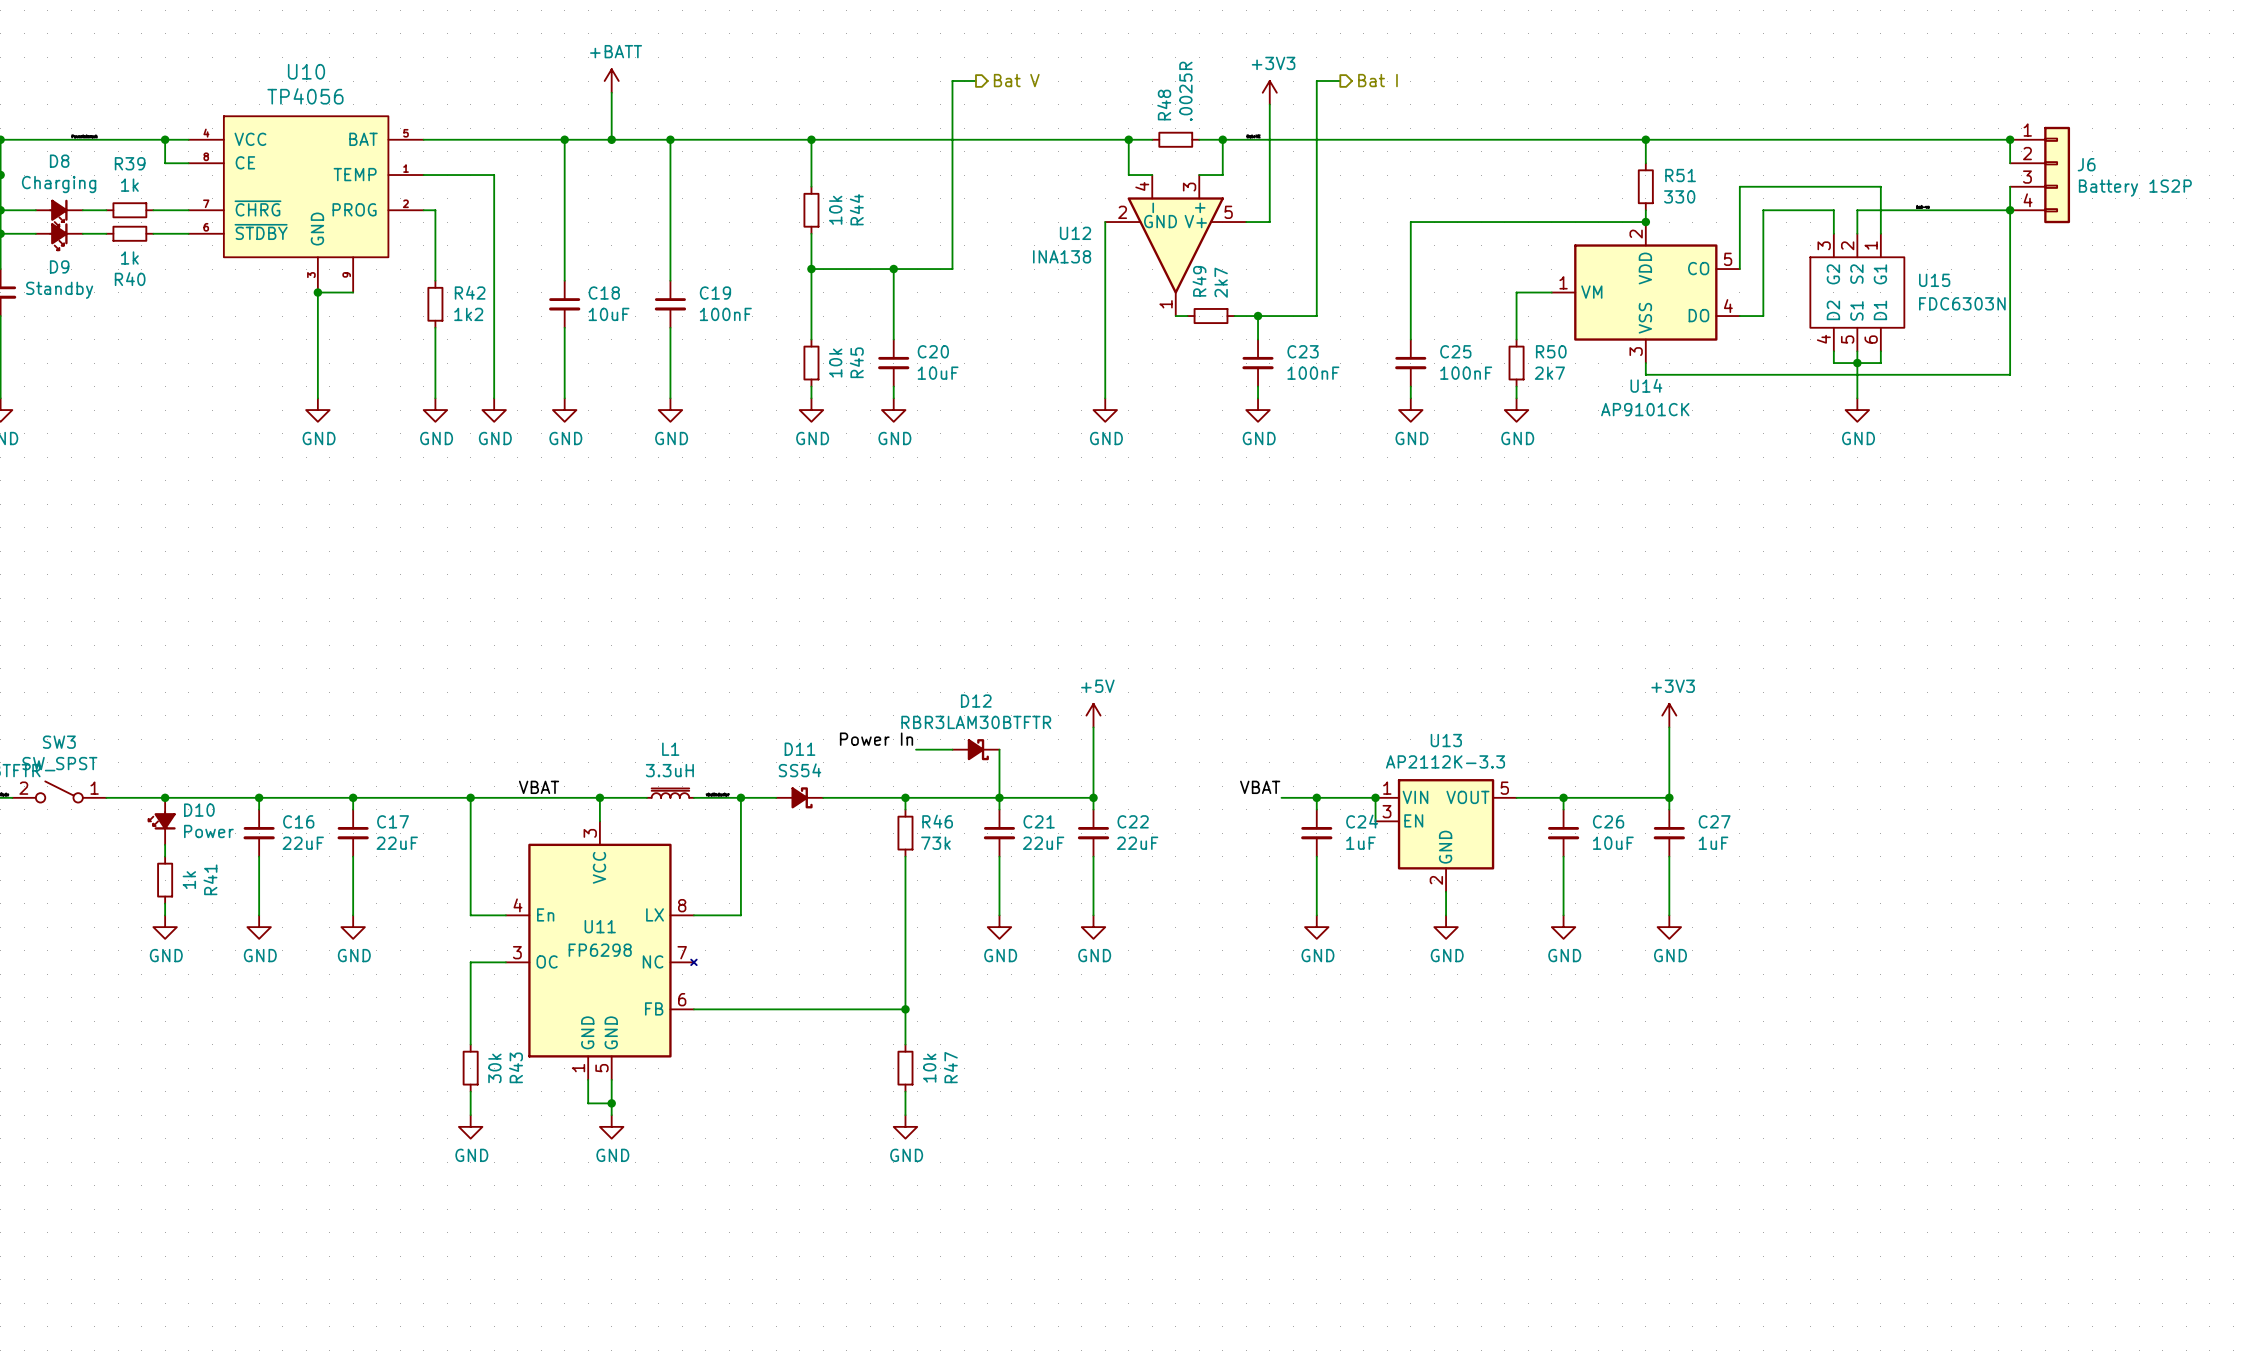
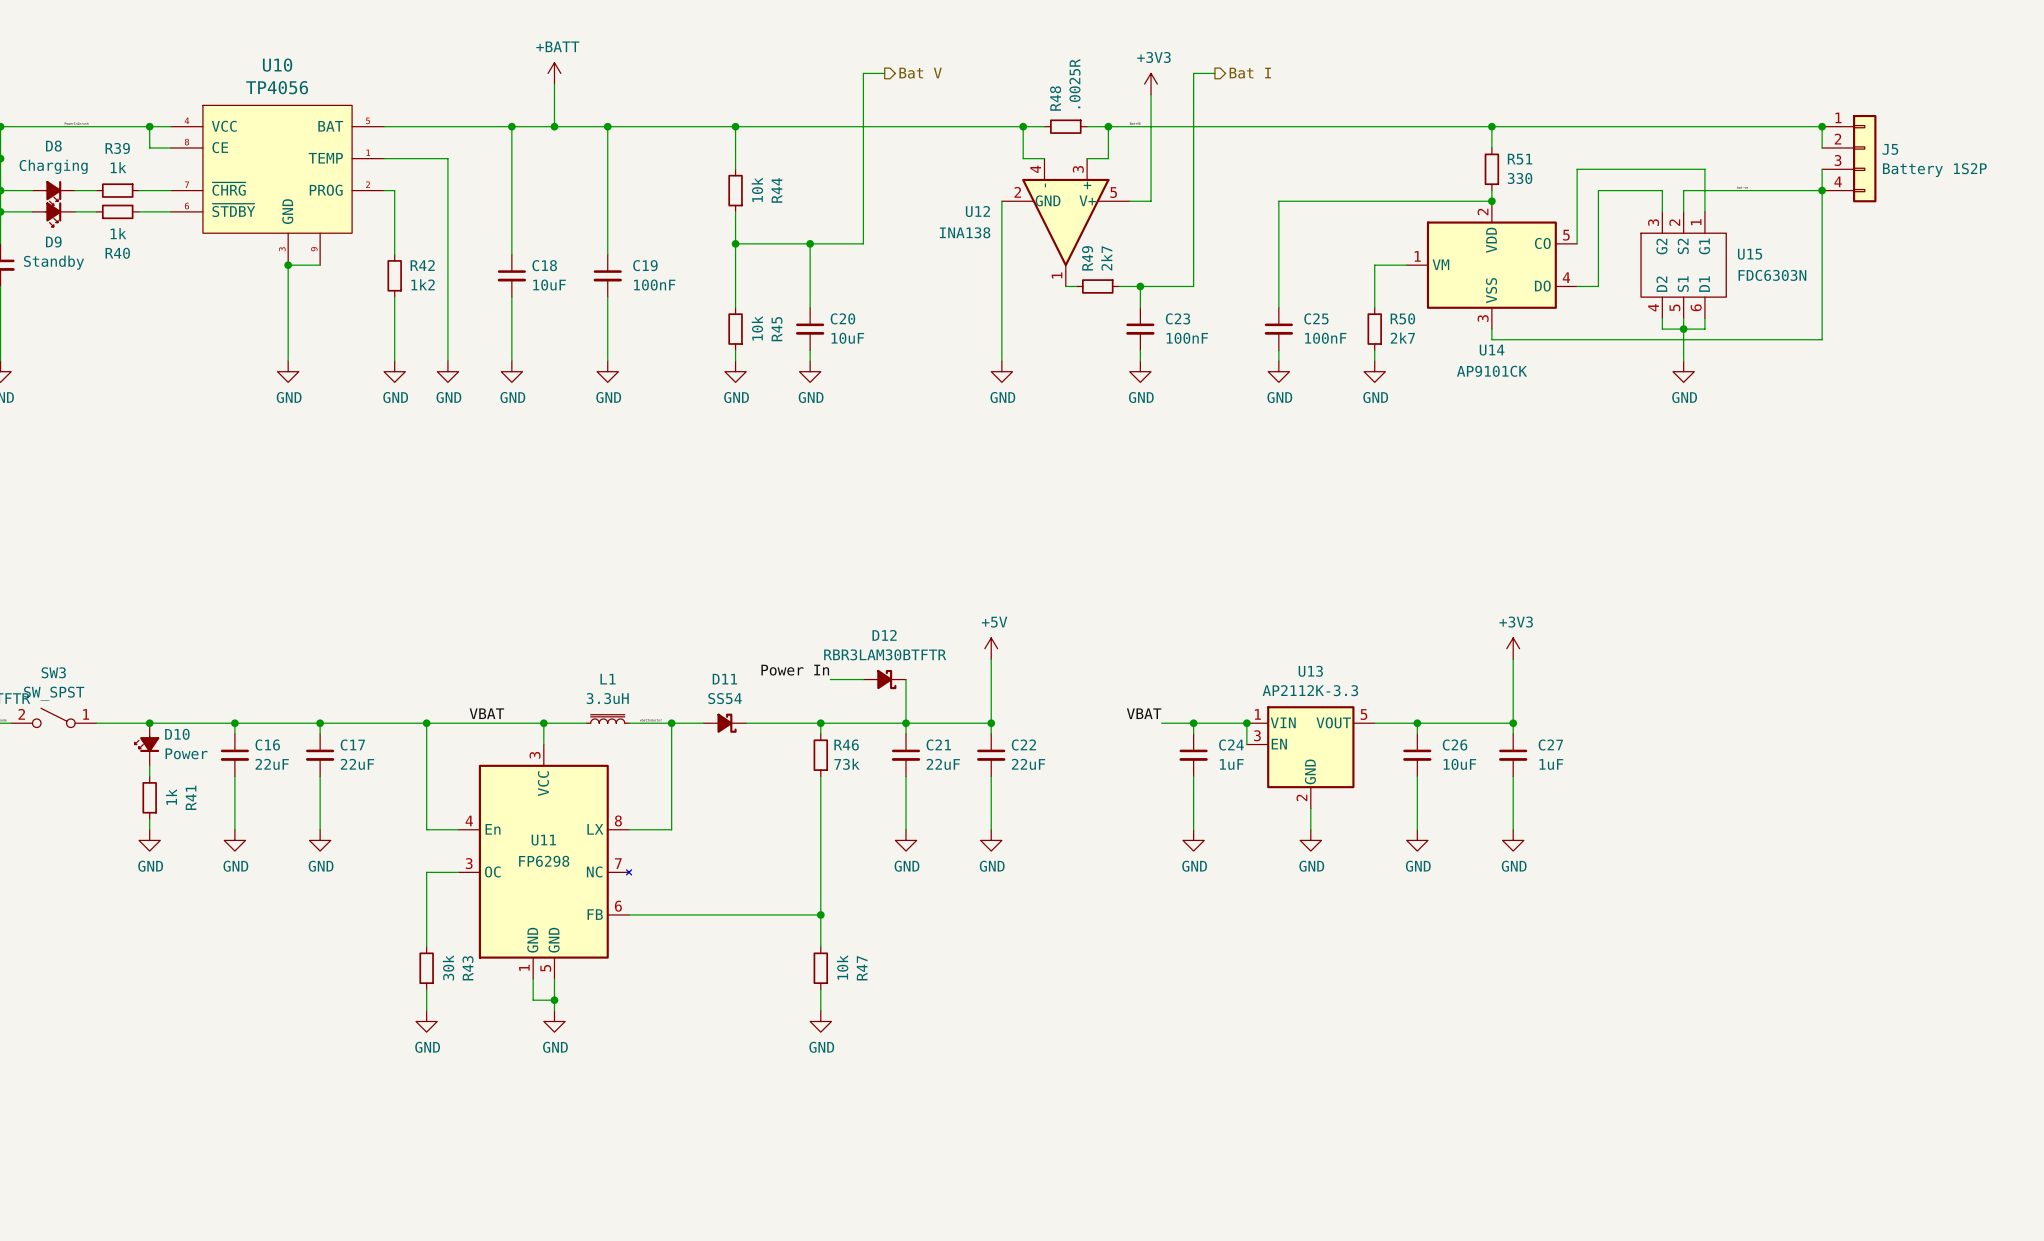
J6 name: J6 (2086, 164) -> J5 (1890, 149)

